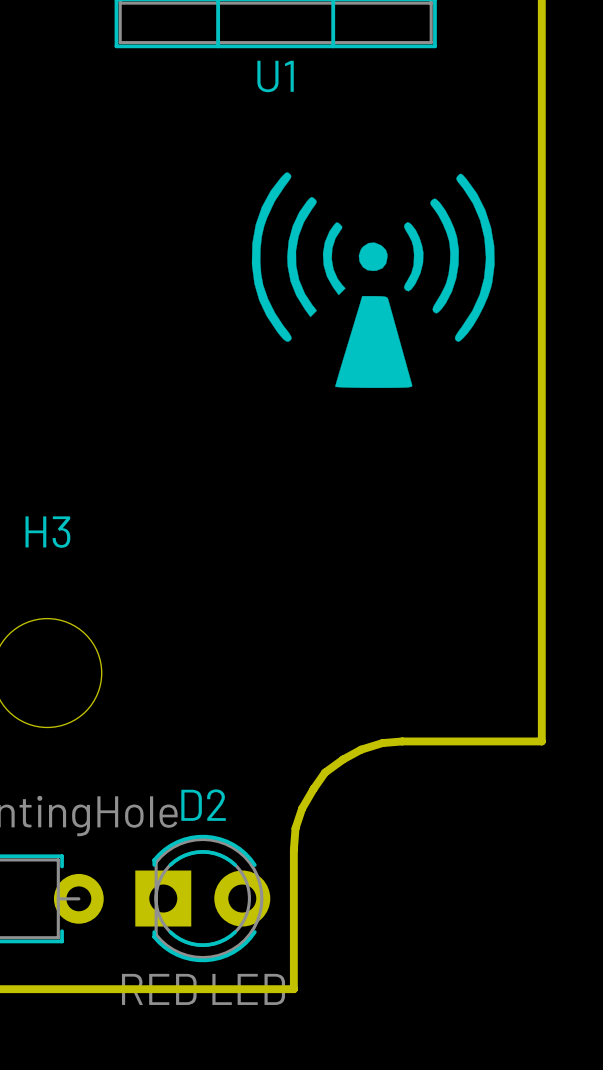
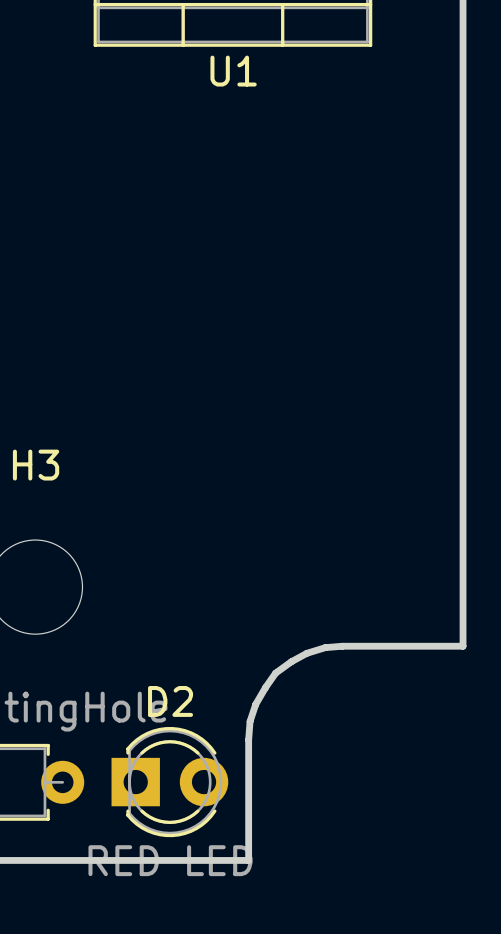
drawing: [251, 172, 495, 388] -> none

